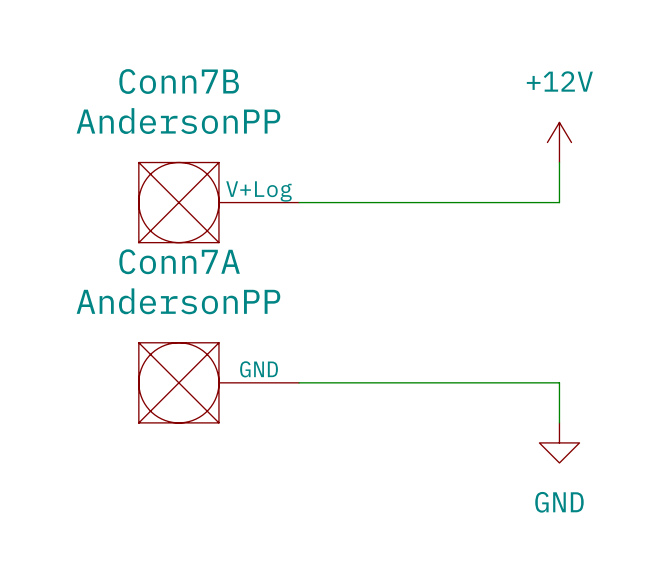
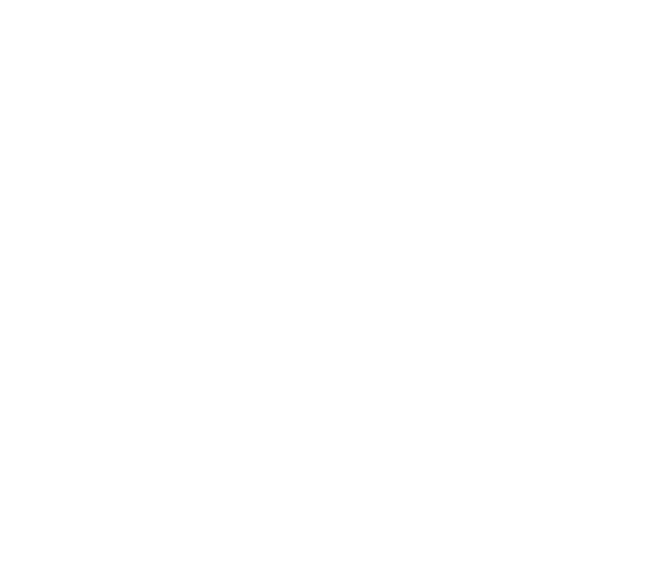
power symbol: +12V (559, 142) -> none
wire: (559, 162) (559, 202) (299, 202) -> none
Conn7B: AndersonPP (218, 202) -> none
Conn7A: AndersonPP (218, 382) -> none
wire: (299, 382) (559, 382) (559, 422) -> none
power symbol: GND (559, 442) -> none

